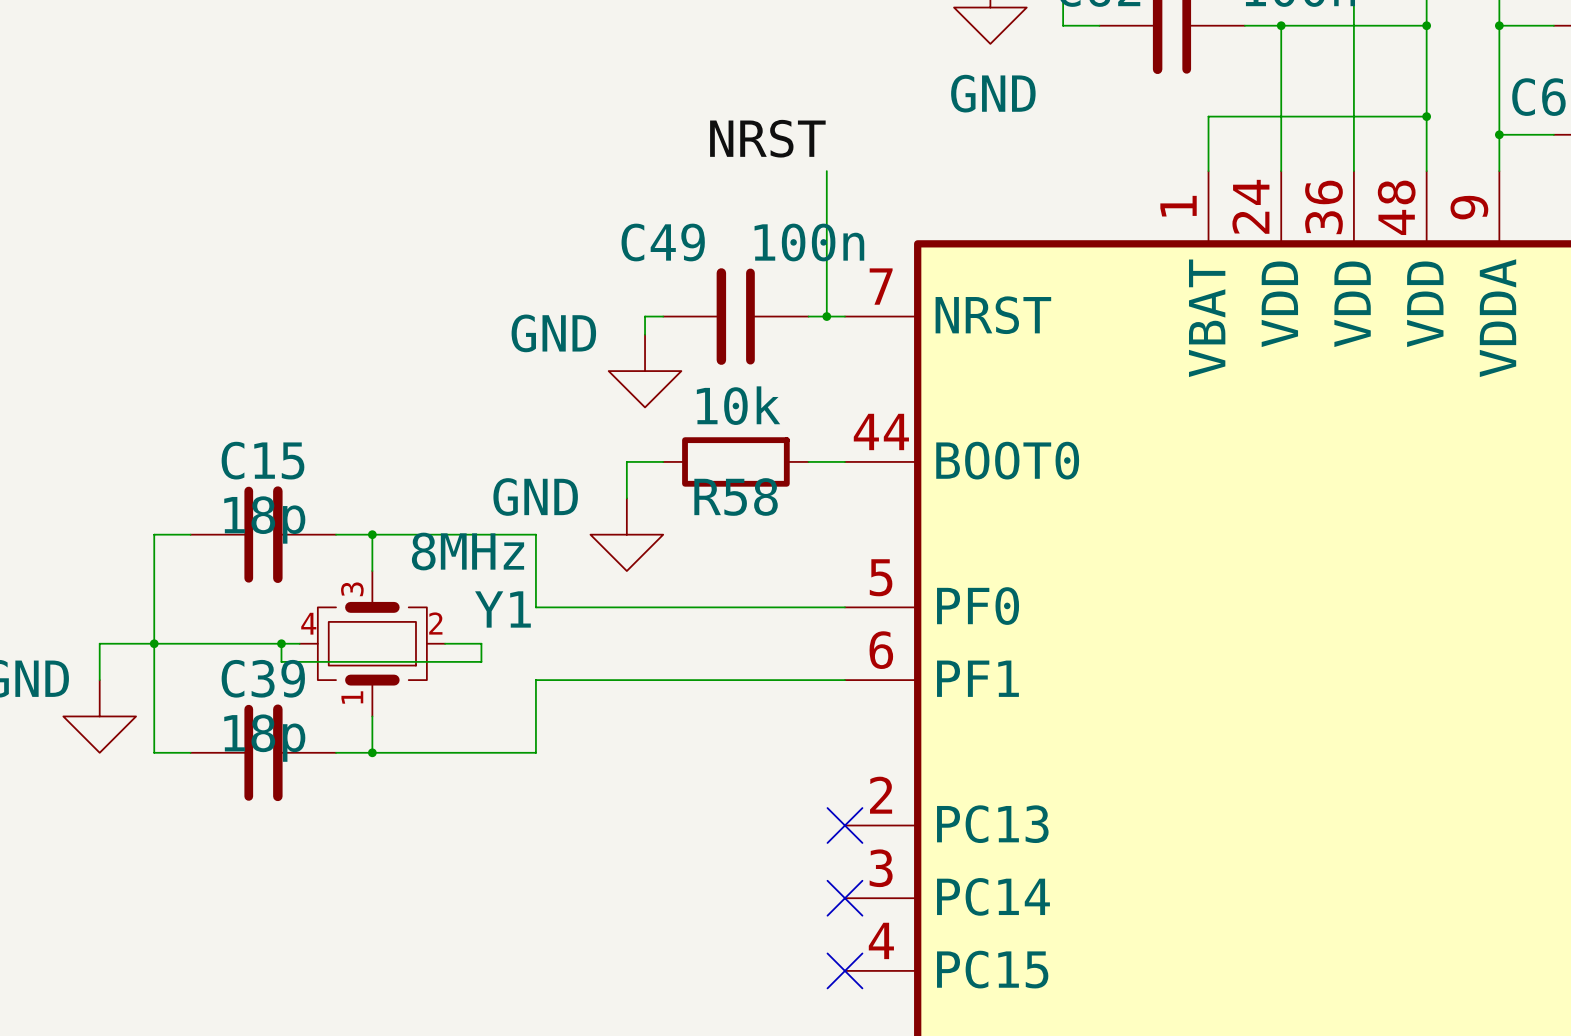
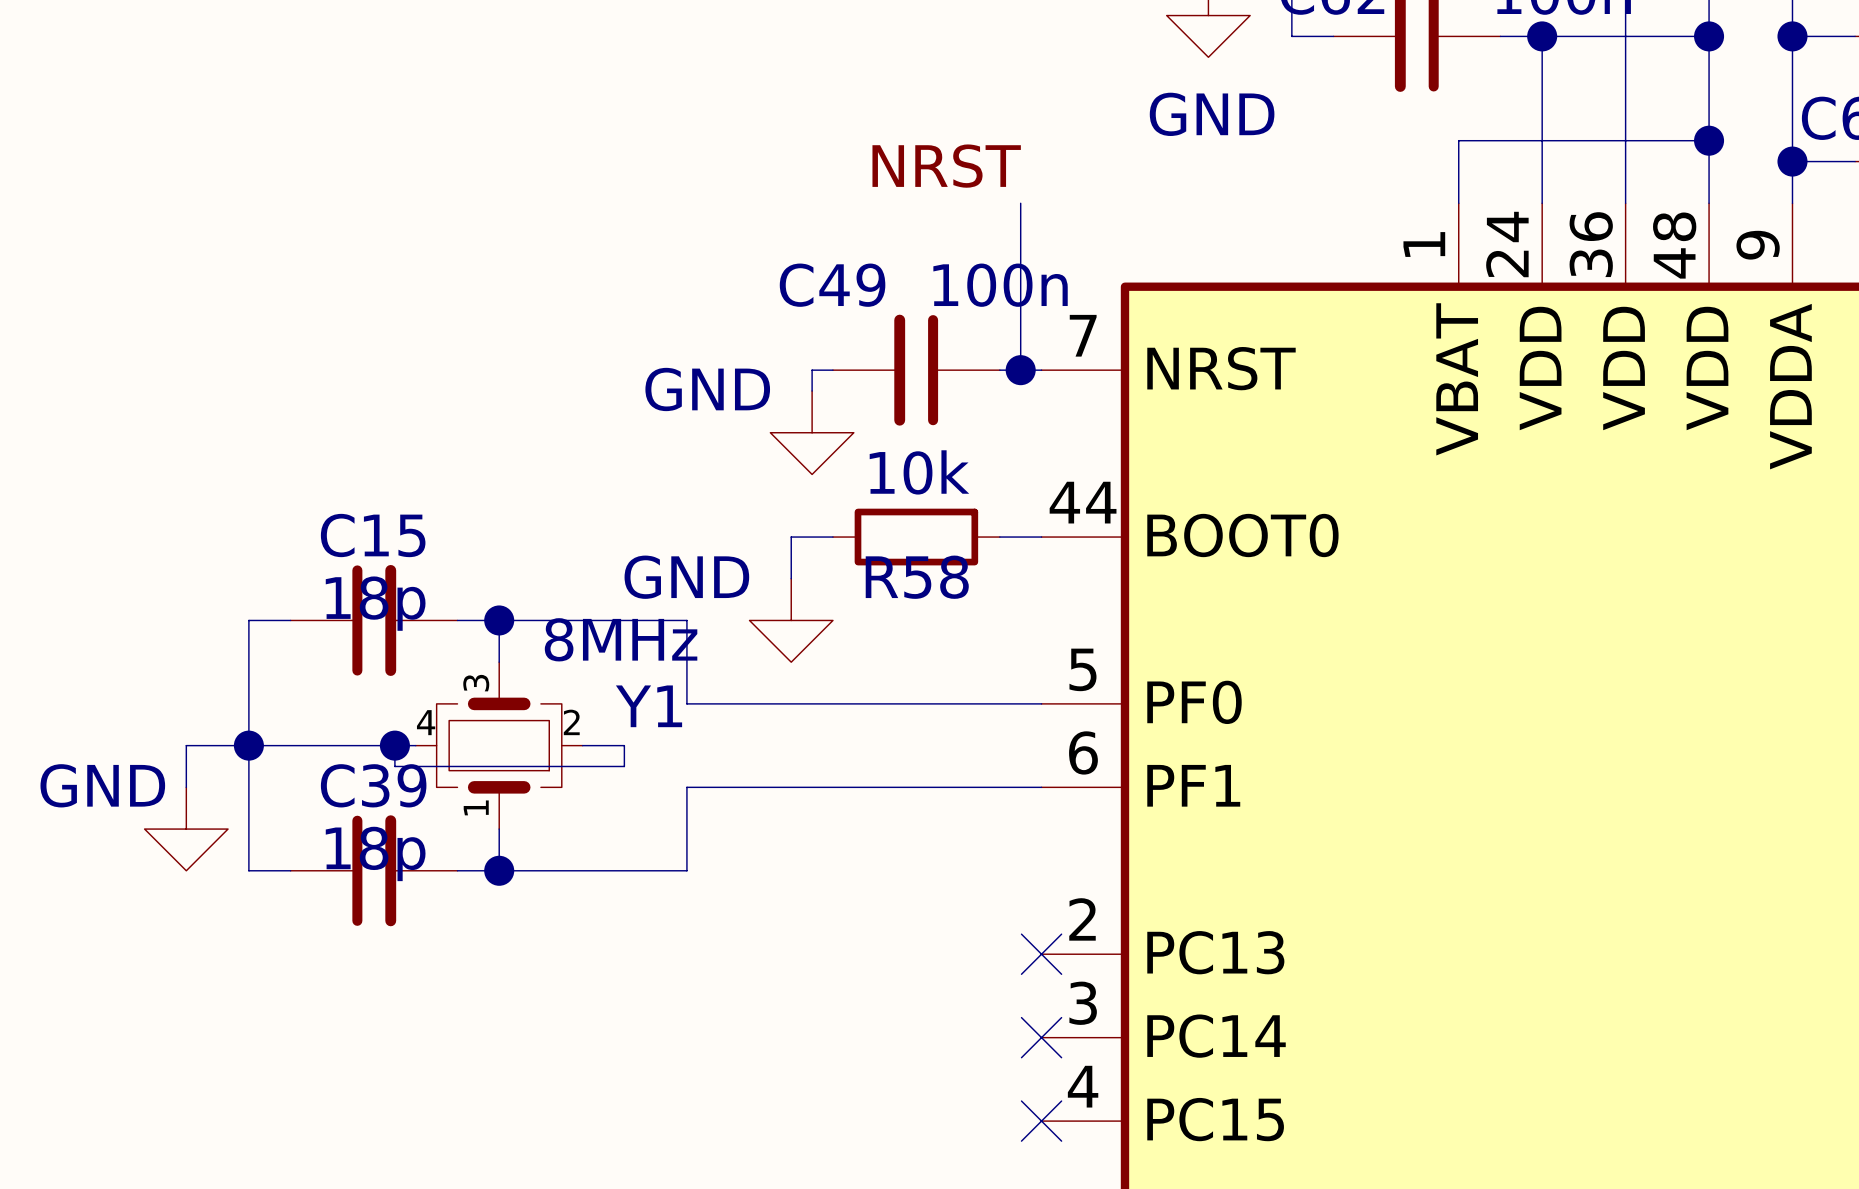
junction size: [1276, 21, 1286, 31] -> [1527, 21, 1558, 52]
junction size: [1422, 21, 1432, 31] -> [1694, 21, 1725, 52]
junction size: [1494, 21, 1504, 31] -> [1777, 21, 1808, 52]
junction size: [1422, 112, 1432, 121] -> [1694, 125, 1725, 156]
junction size: [1494, 130, 1504, 140] -> [1777, 146, 1808, 177]
junction size: [822, 312, 832, 321] -> [1005, 355, 1036, 386]
junction size: [368, 530, 377, 540] -> [484, 605, 515, 636]
junction size: [149, 639, 159, 649] -> [233, 730, 264, 761]
junction size: [277, 639, 286, 649] -> [379, 730, 410, 761]
junction size: [368, 748, 377, 758] -> [484, 855, 515, 886]

